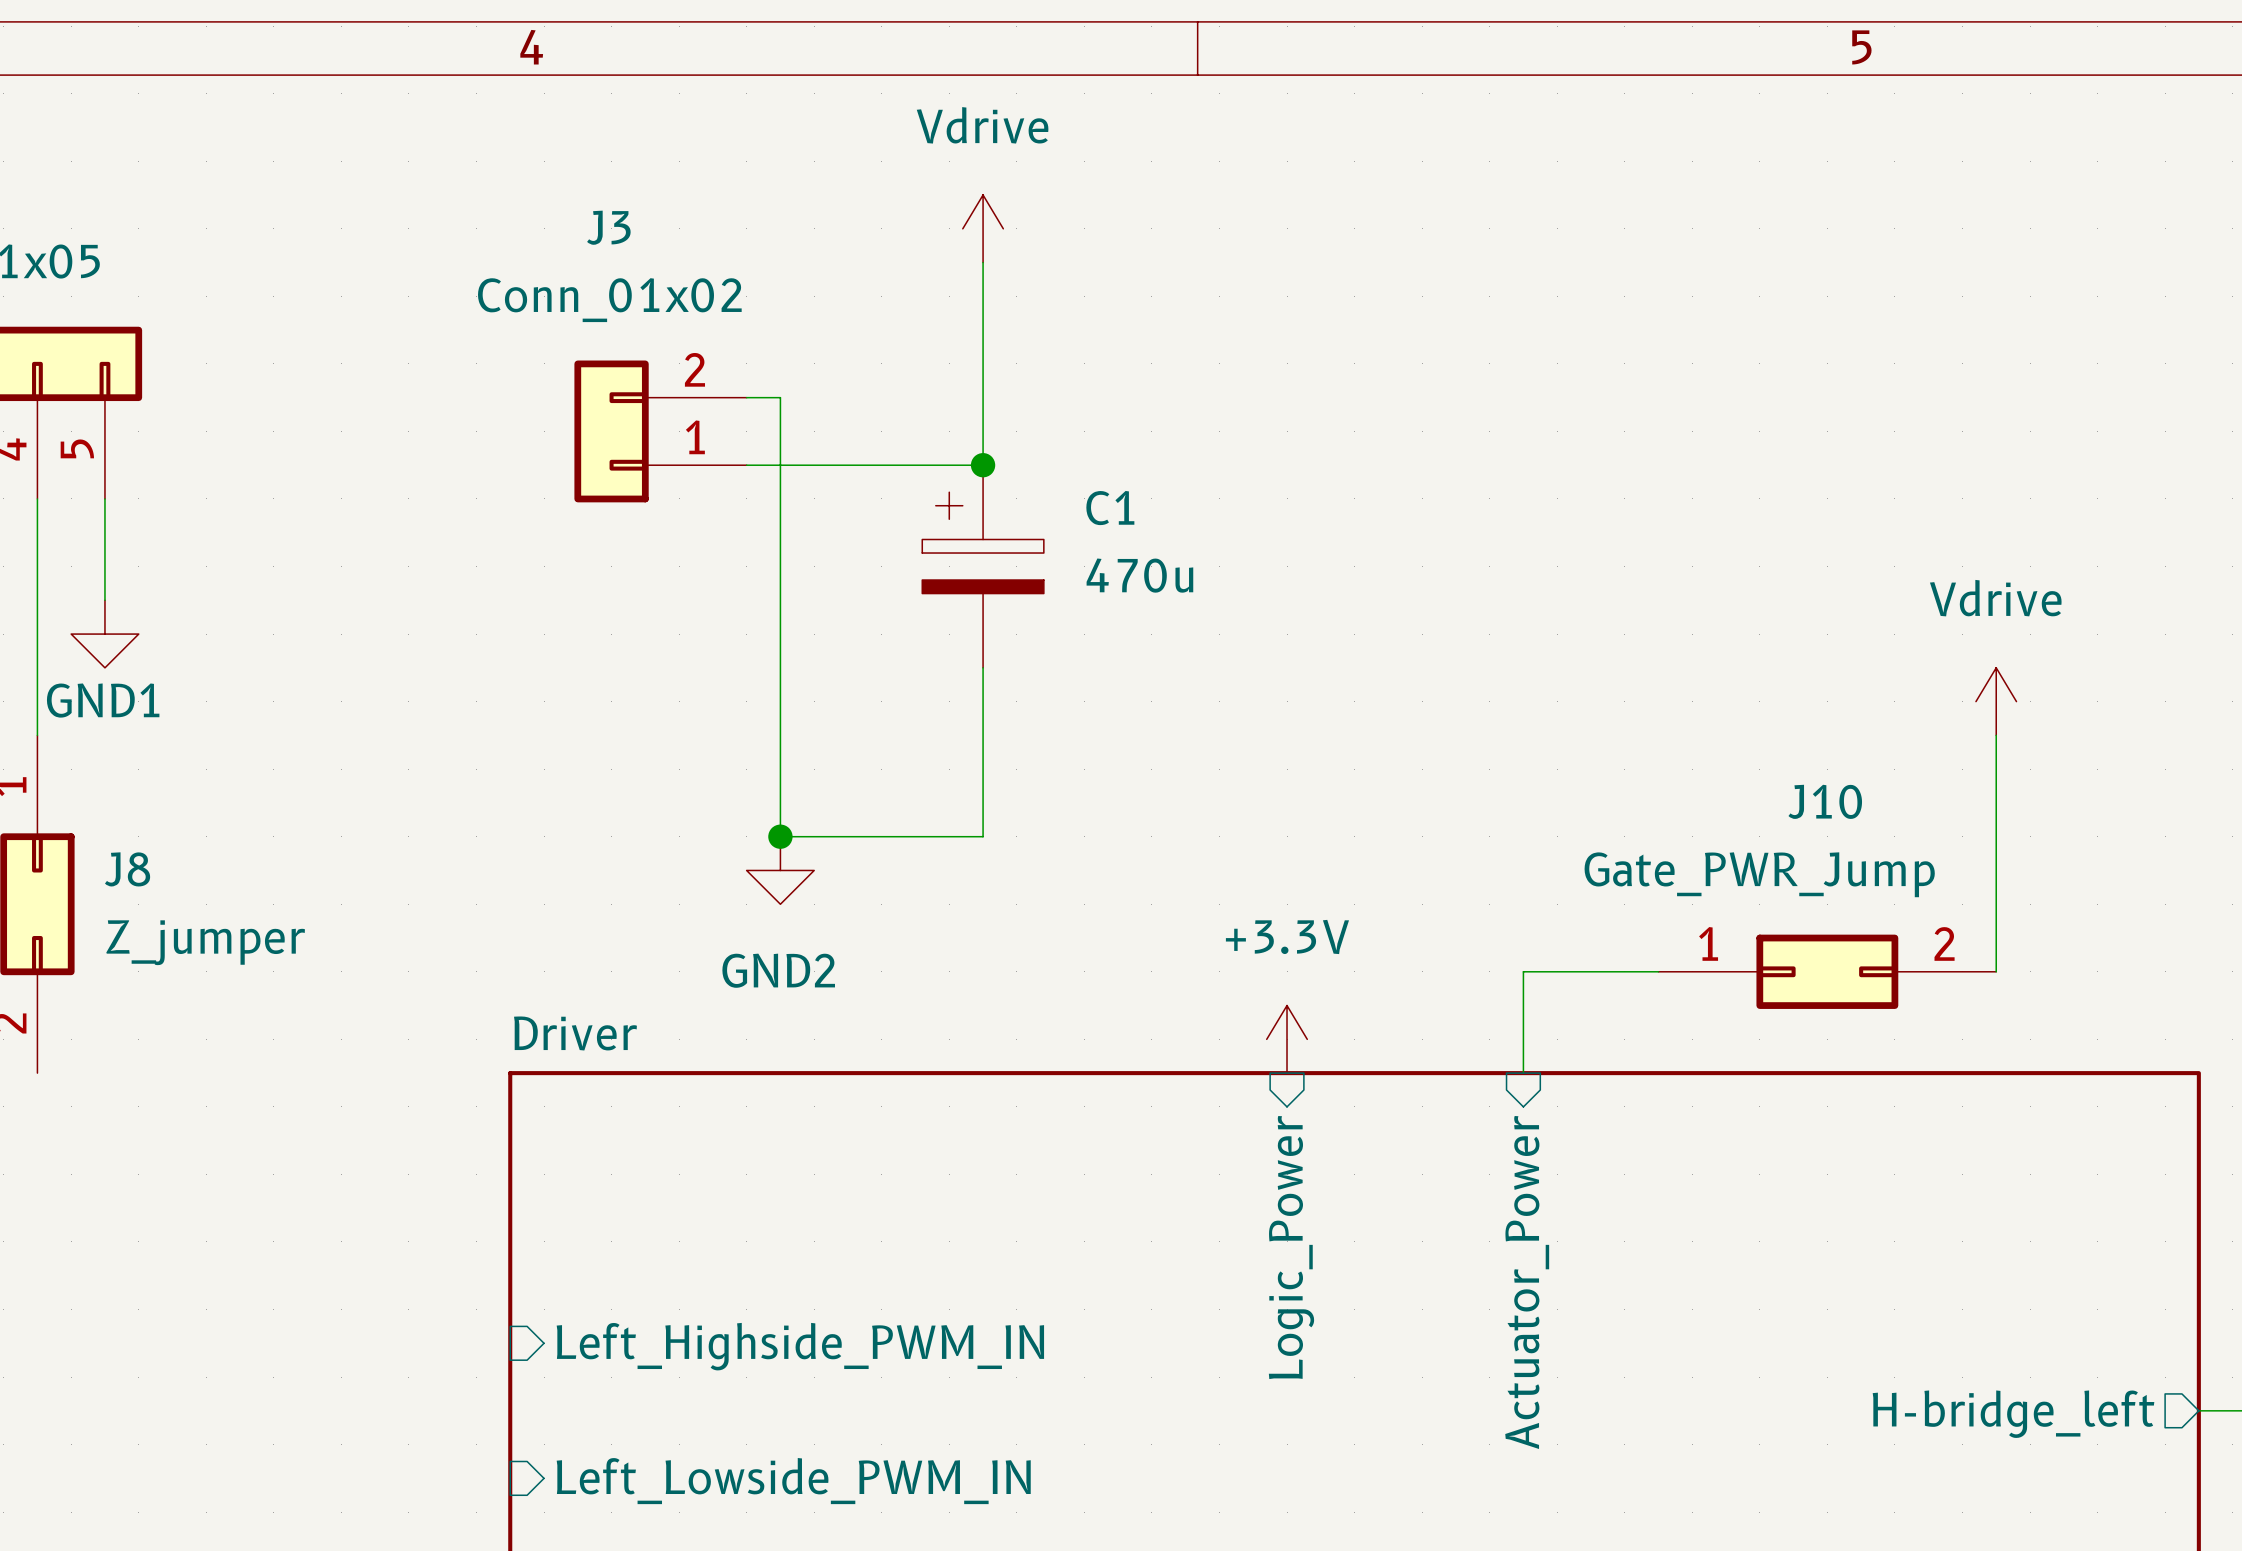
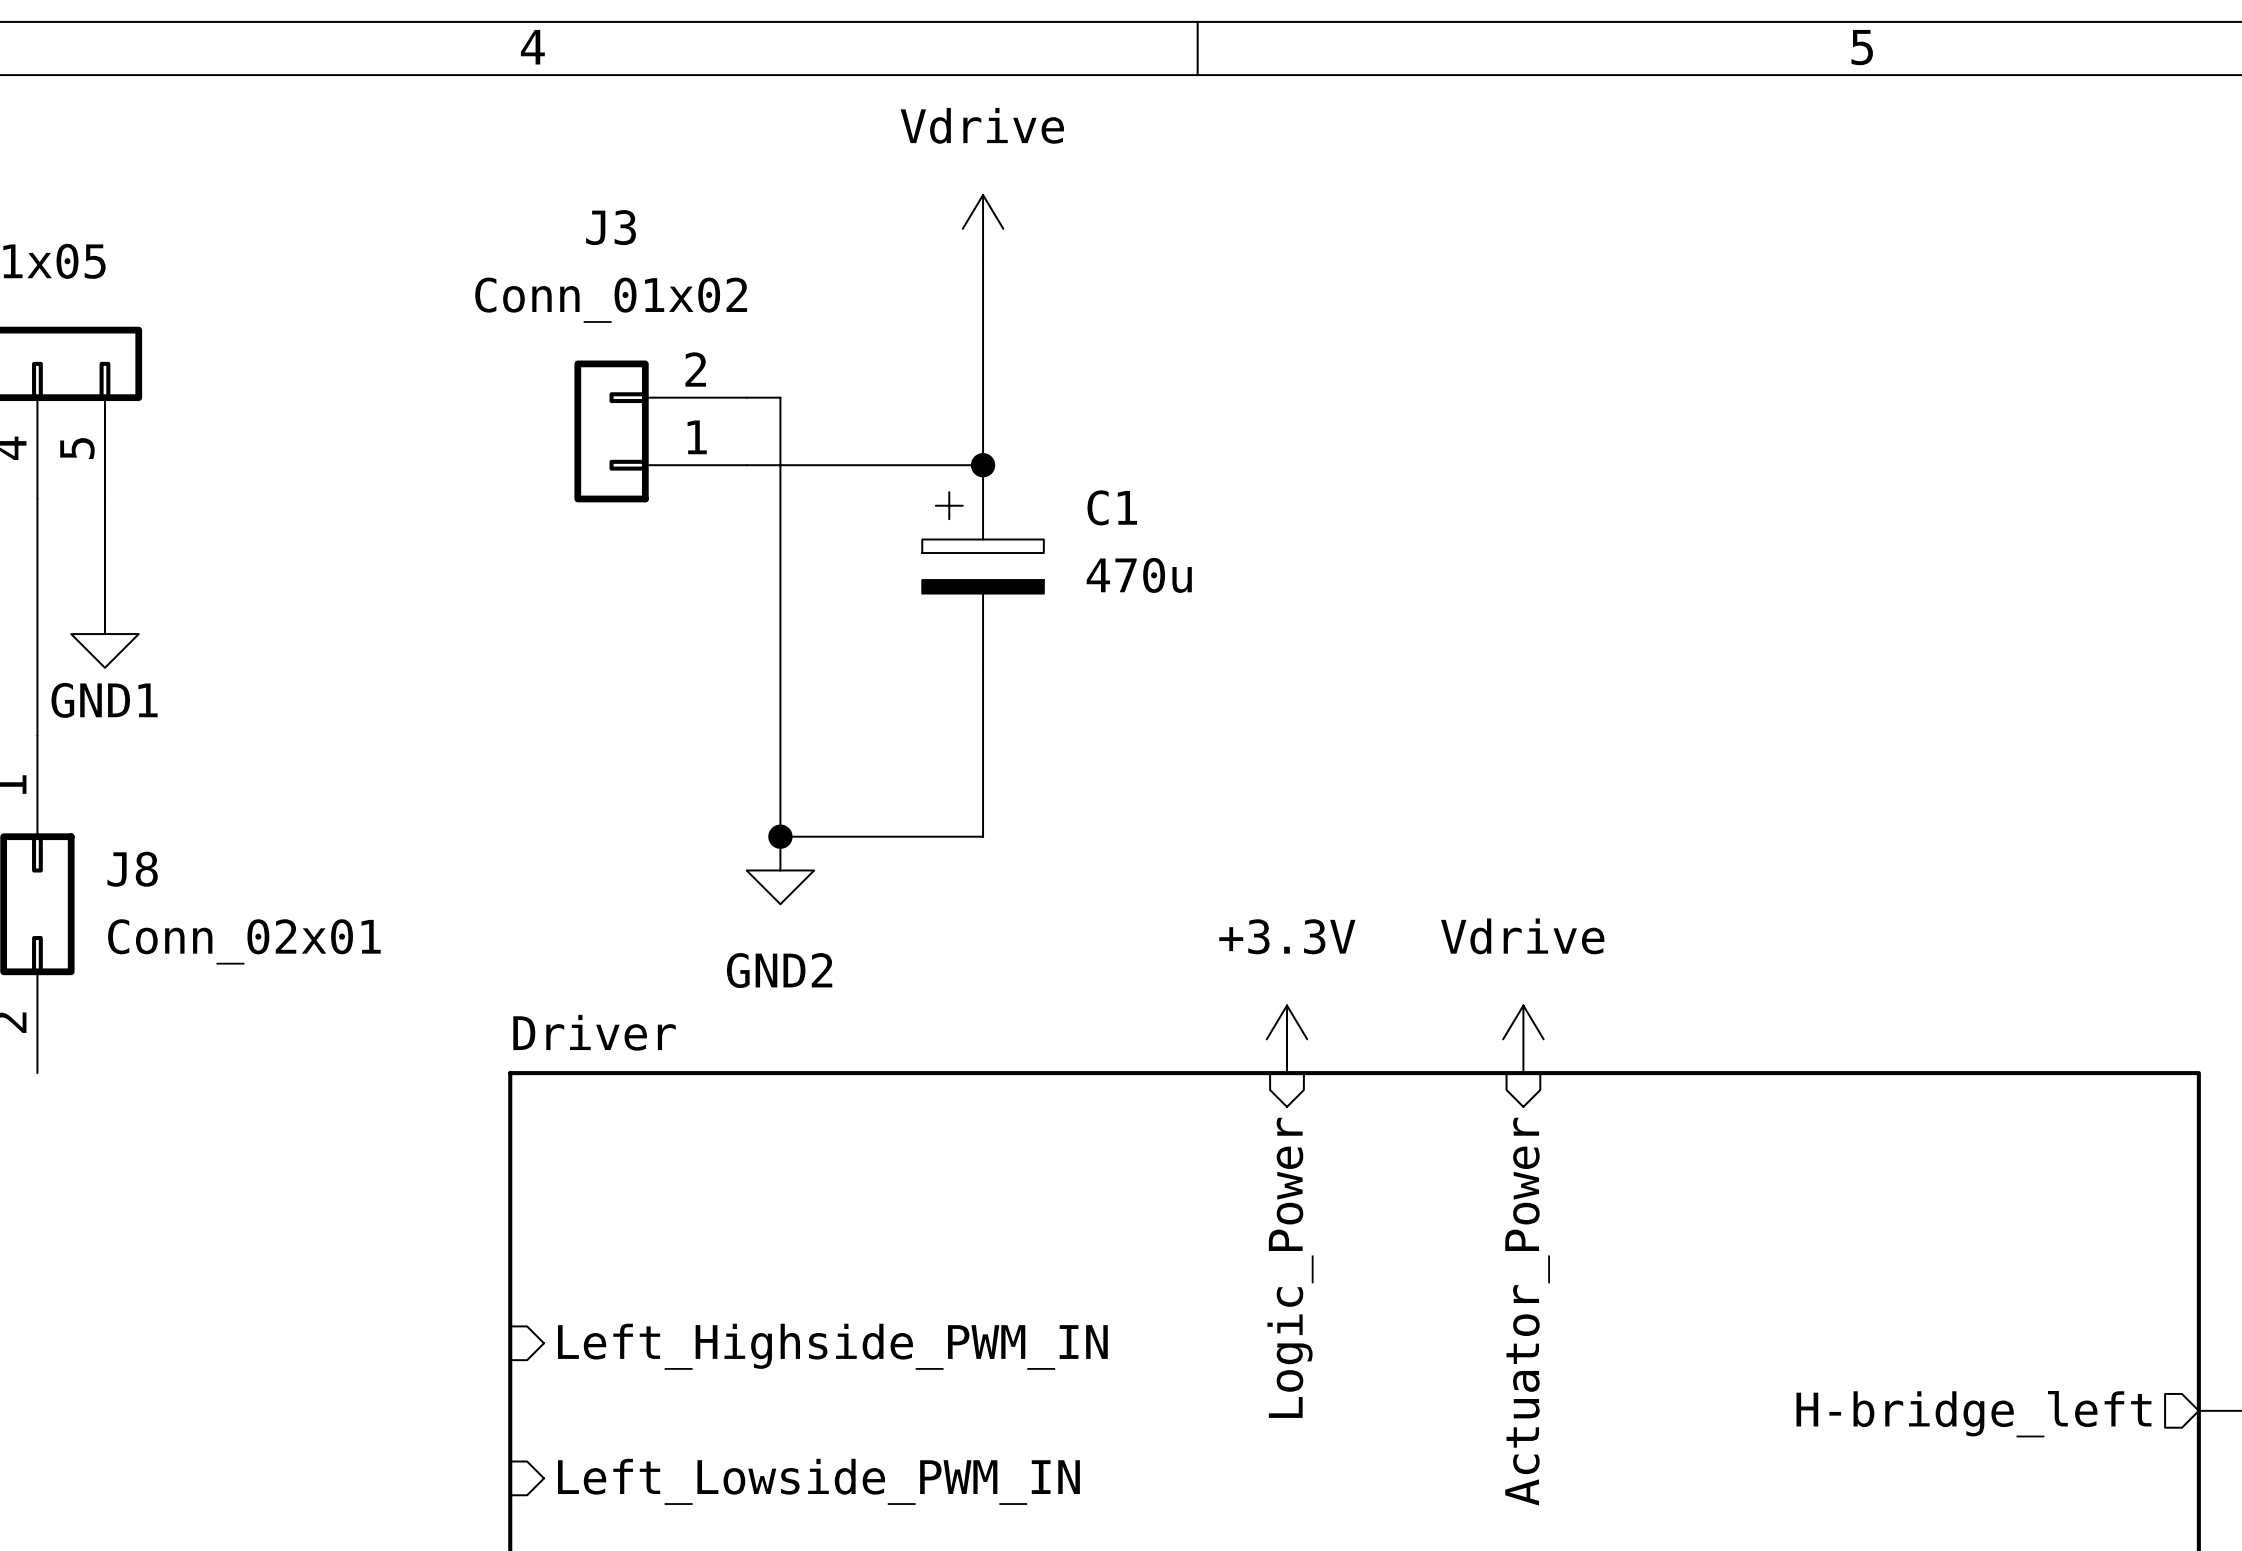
power symbol position: Vdrive (1996, 701) -> Vdrive (1523, 1039)
wire: (1996, 735) (1996, 971) -> none
J8 value: Z_jumper (205, 942) -> Conn_02x01 (244, 941)
wire: (1658, 971) (1523, 971) (1523, 1073) -> none
J10: Gate_PWR_Jump (1827, 971) -> none

